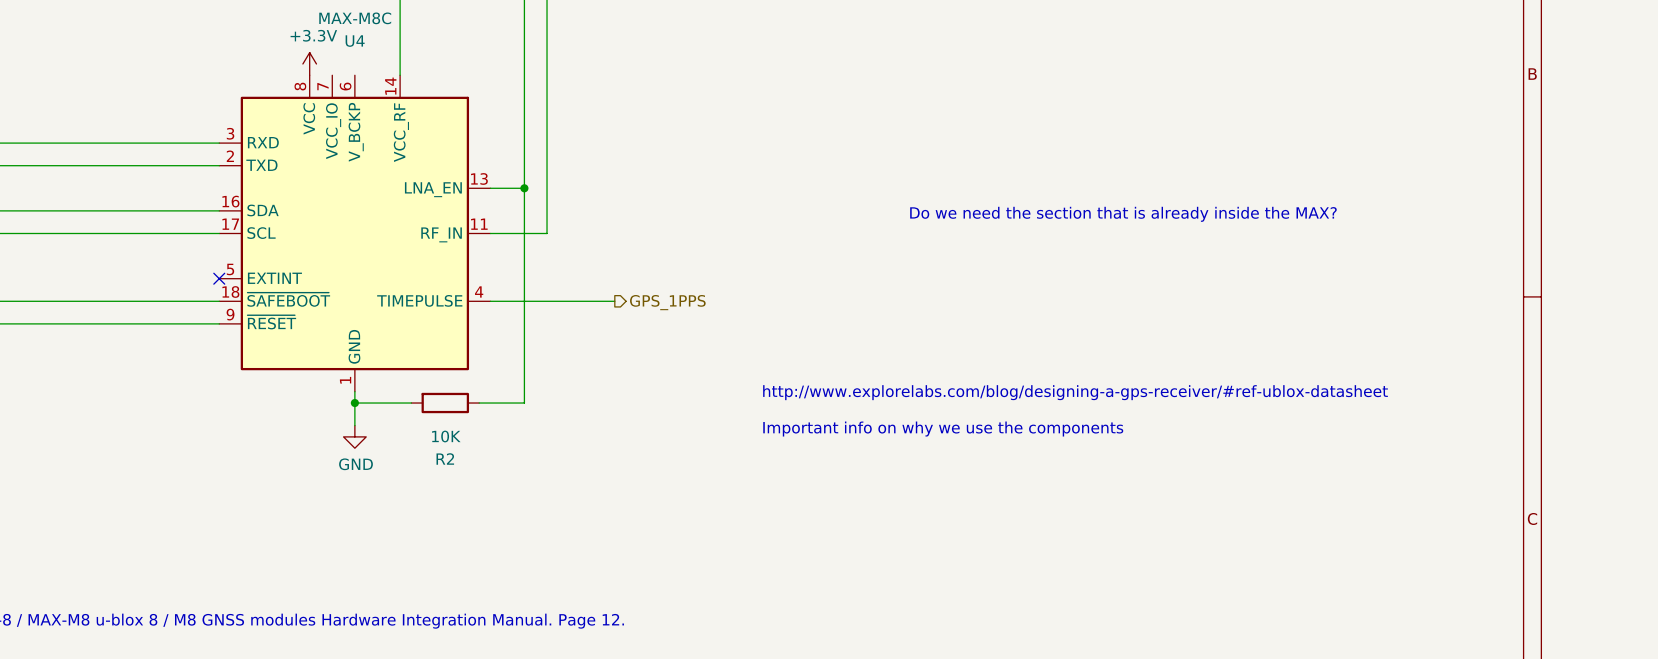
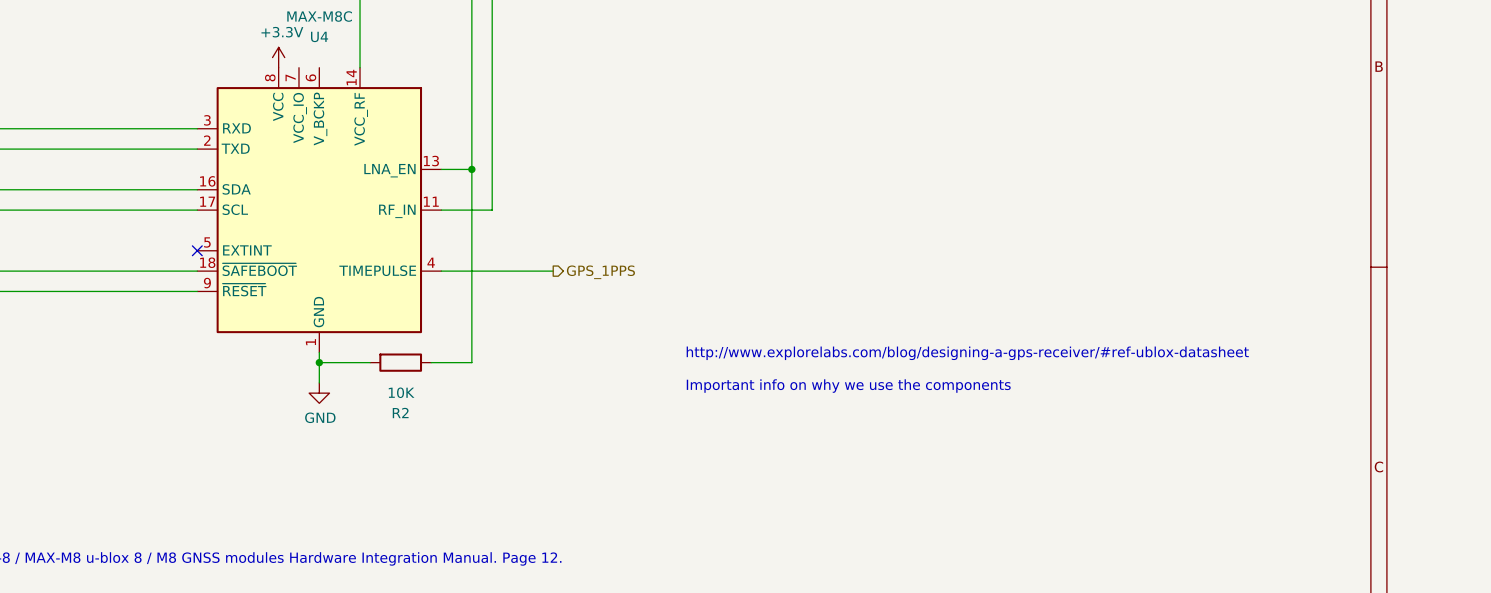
text: Do we need the section that is already inside the MAX? (1123, 214) -> none

